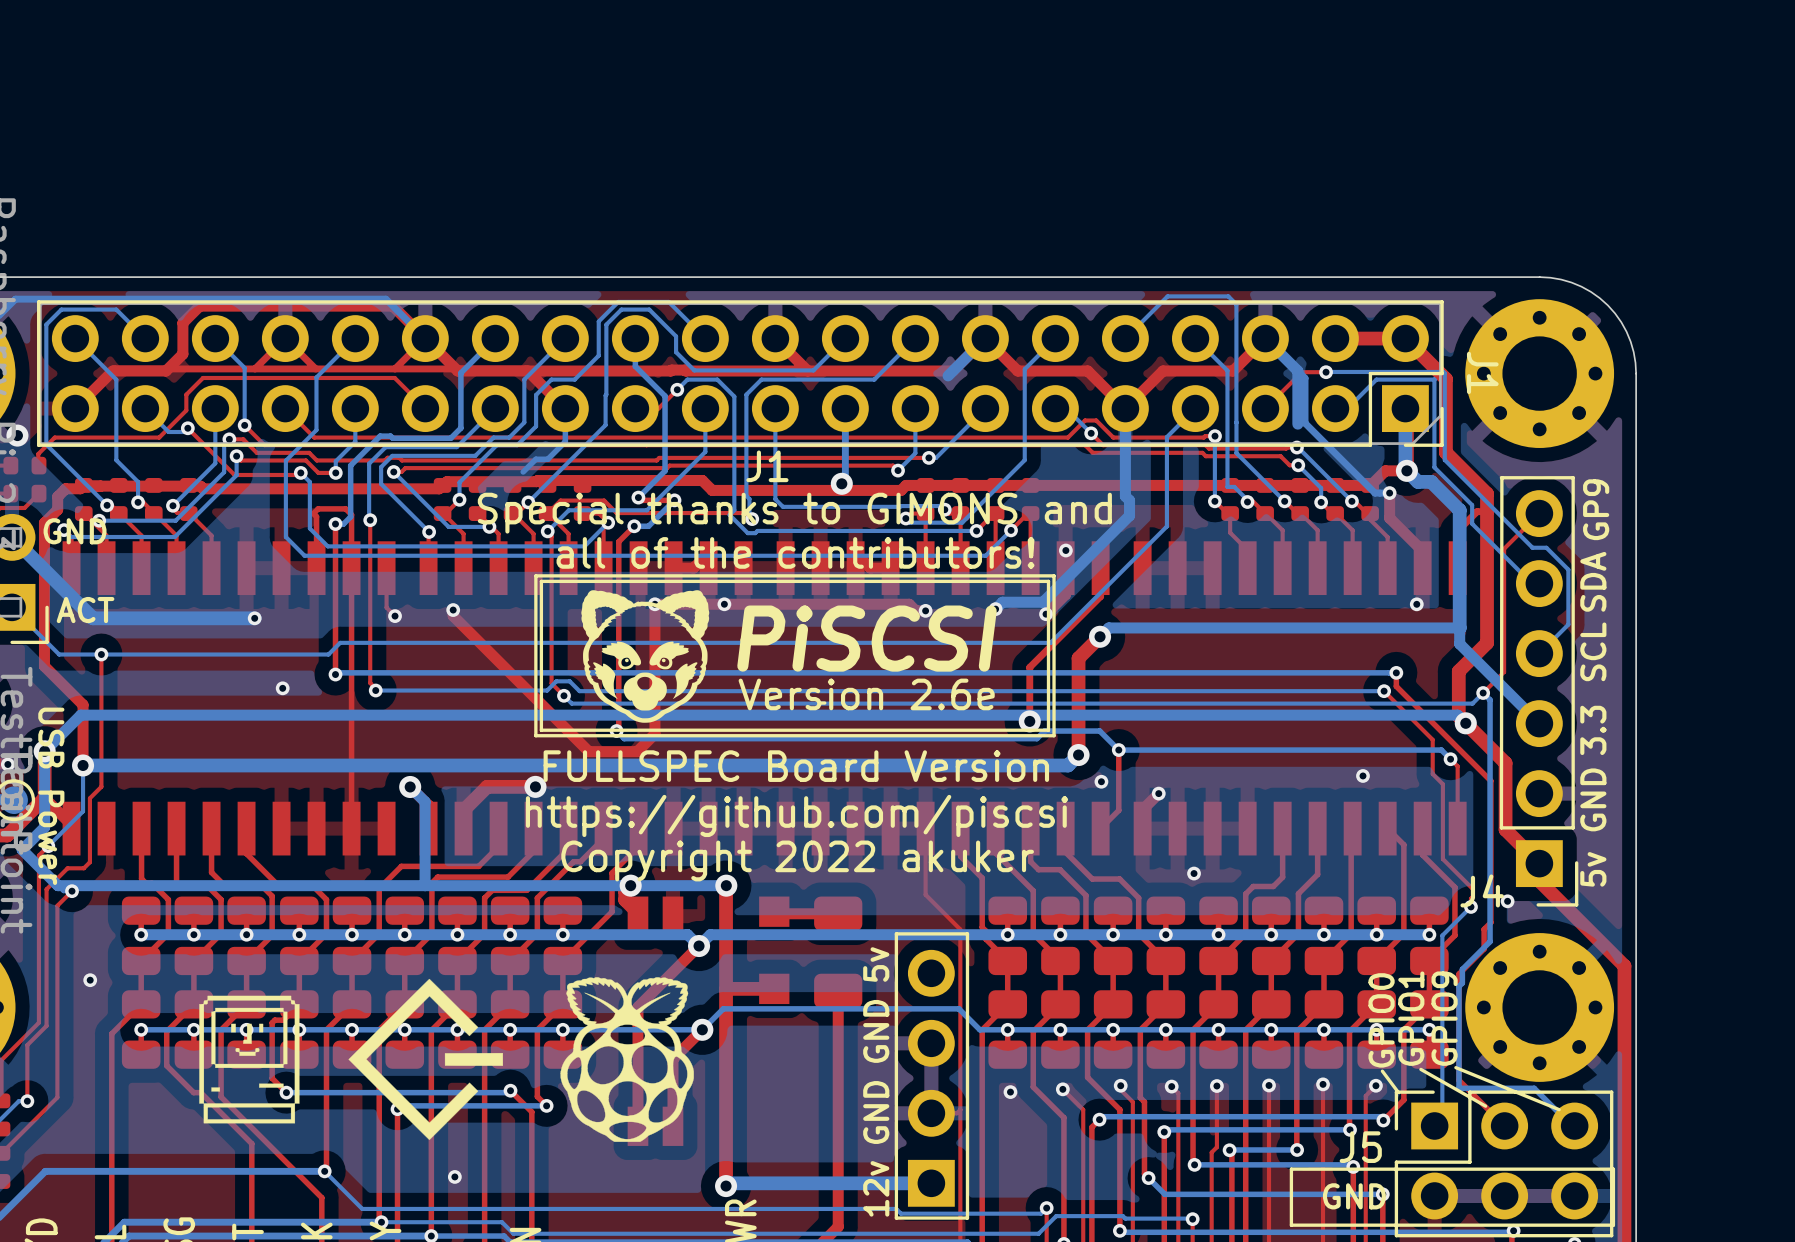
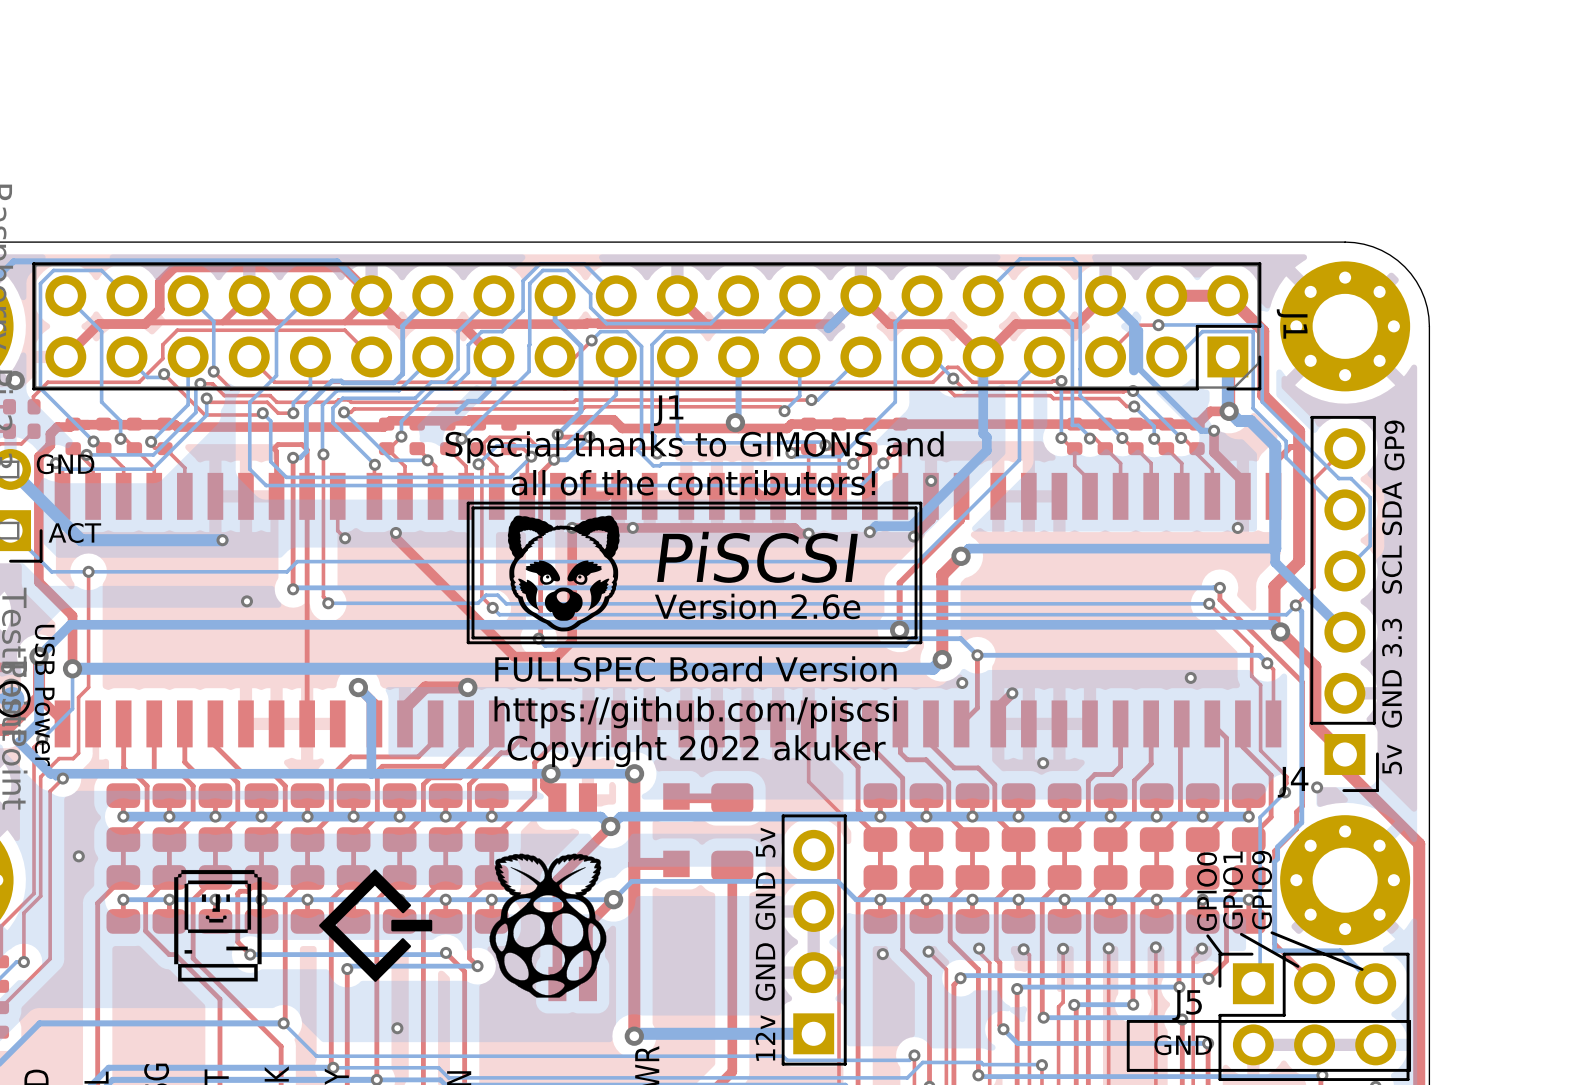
drawing shape: [348, 978, 503, 1140] -> [319, 869, 433, 982]

